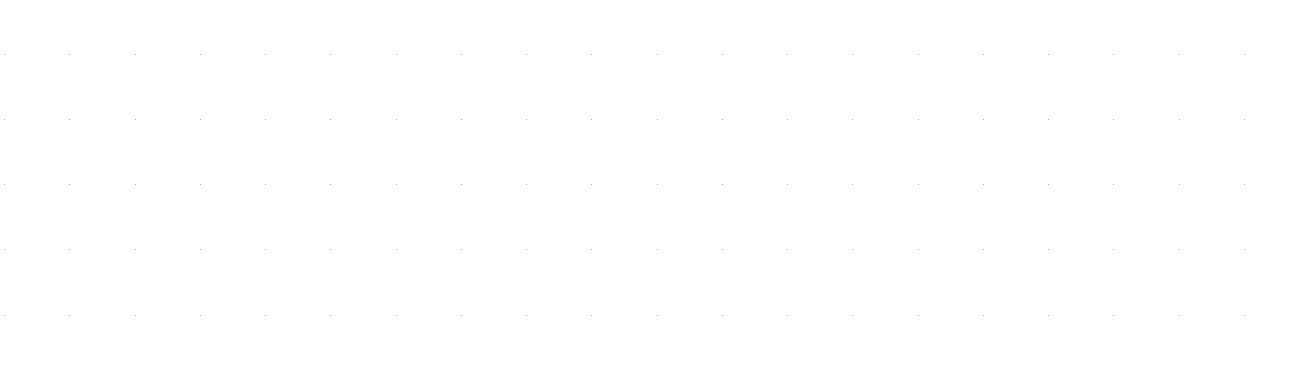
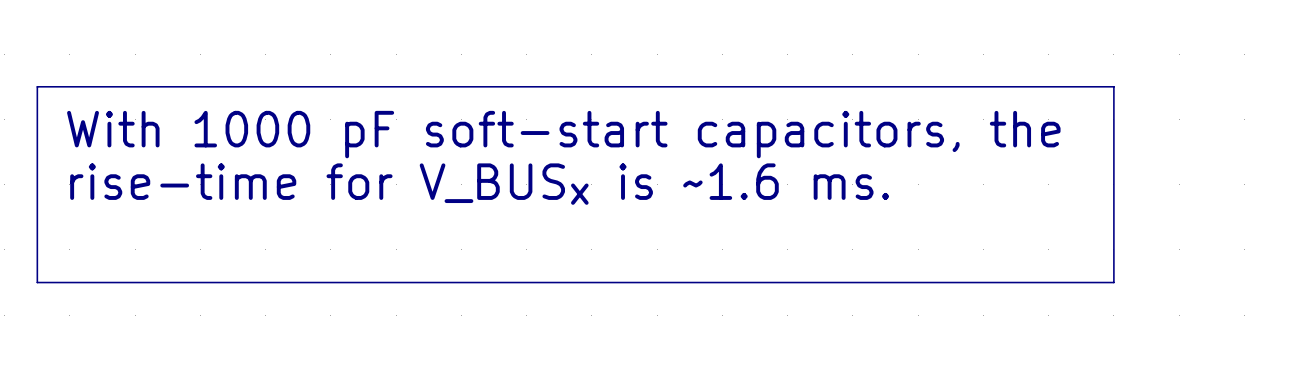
line: none -> (37, 86) (1113, 86) (1113, 282) (37, 282) (37, 86)
text: none -> With 1000 pF soft-start capacitors, the (563, 134)
text: none -> rise-time for V_BUSx is ~1.6 ms. (479, 184)

